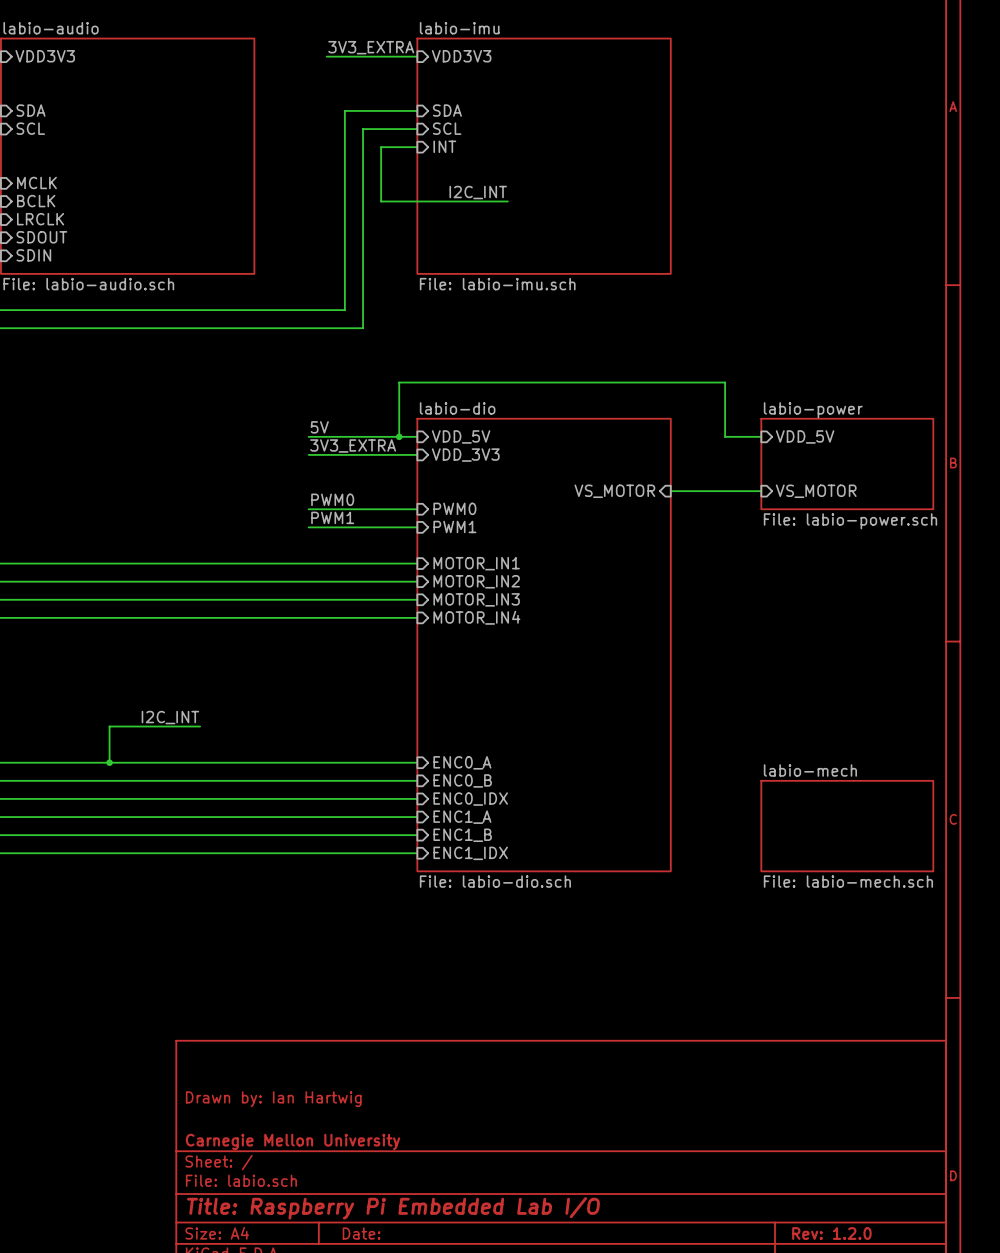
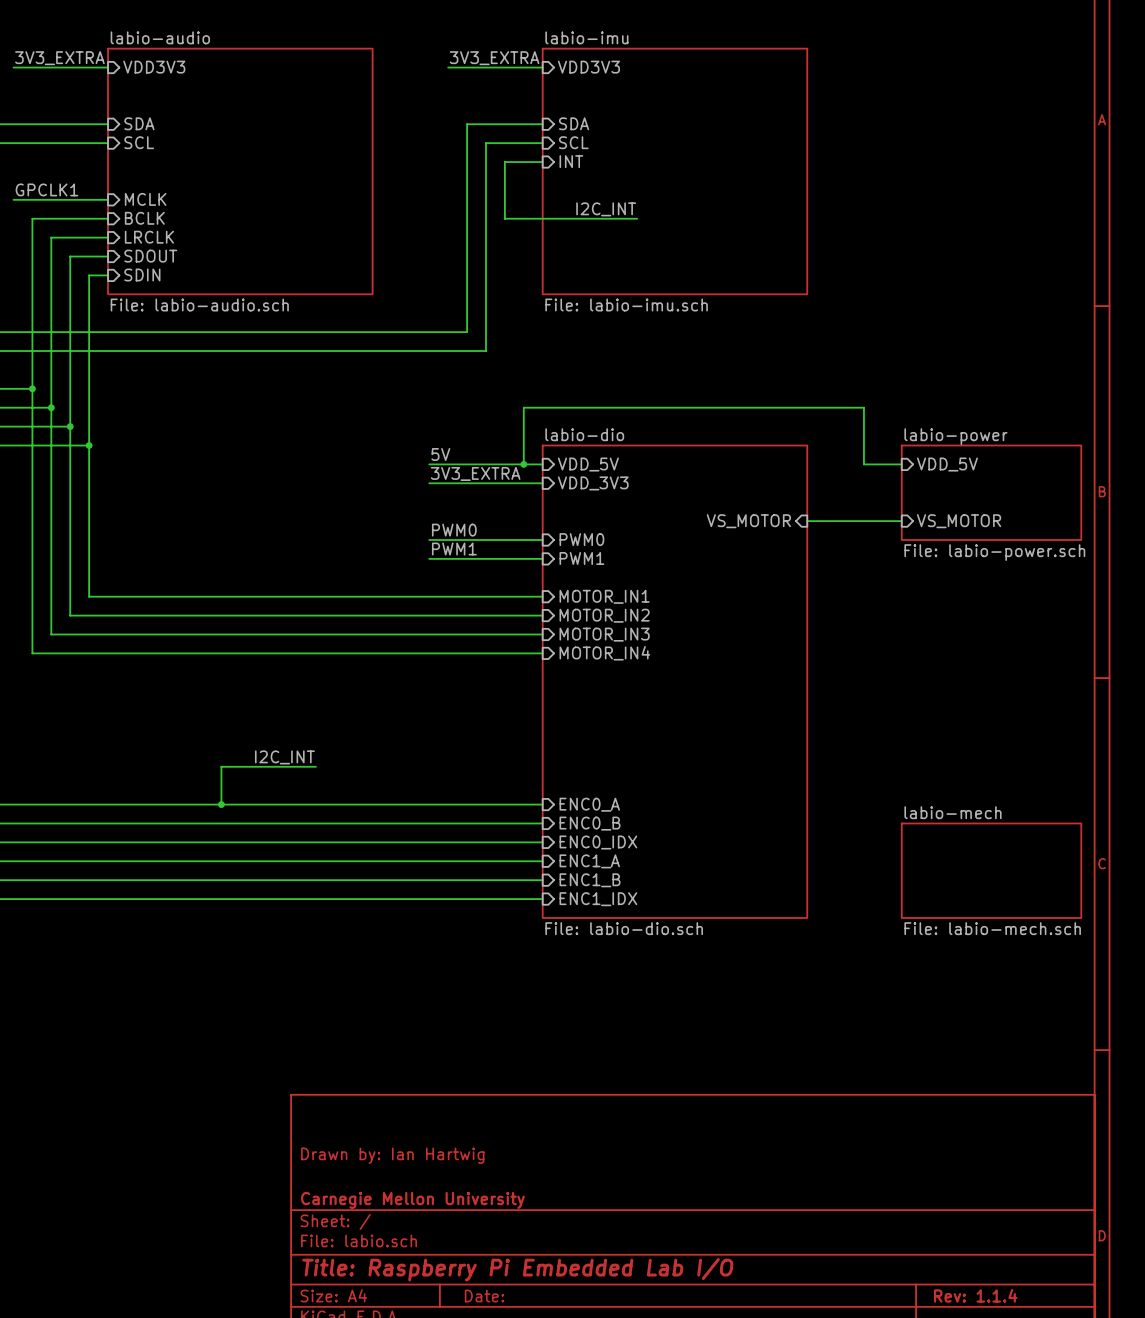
title block: Rev: 1.2.0 (831, 1233) -> Rev: 1.1.4 (975, 1295)

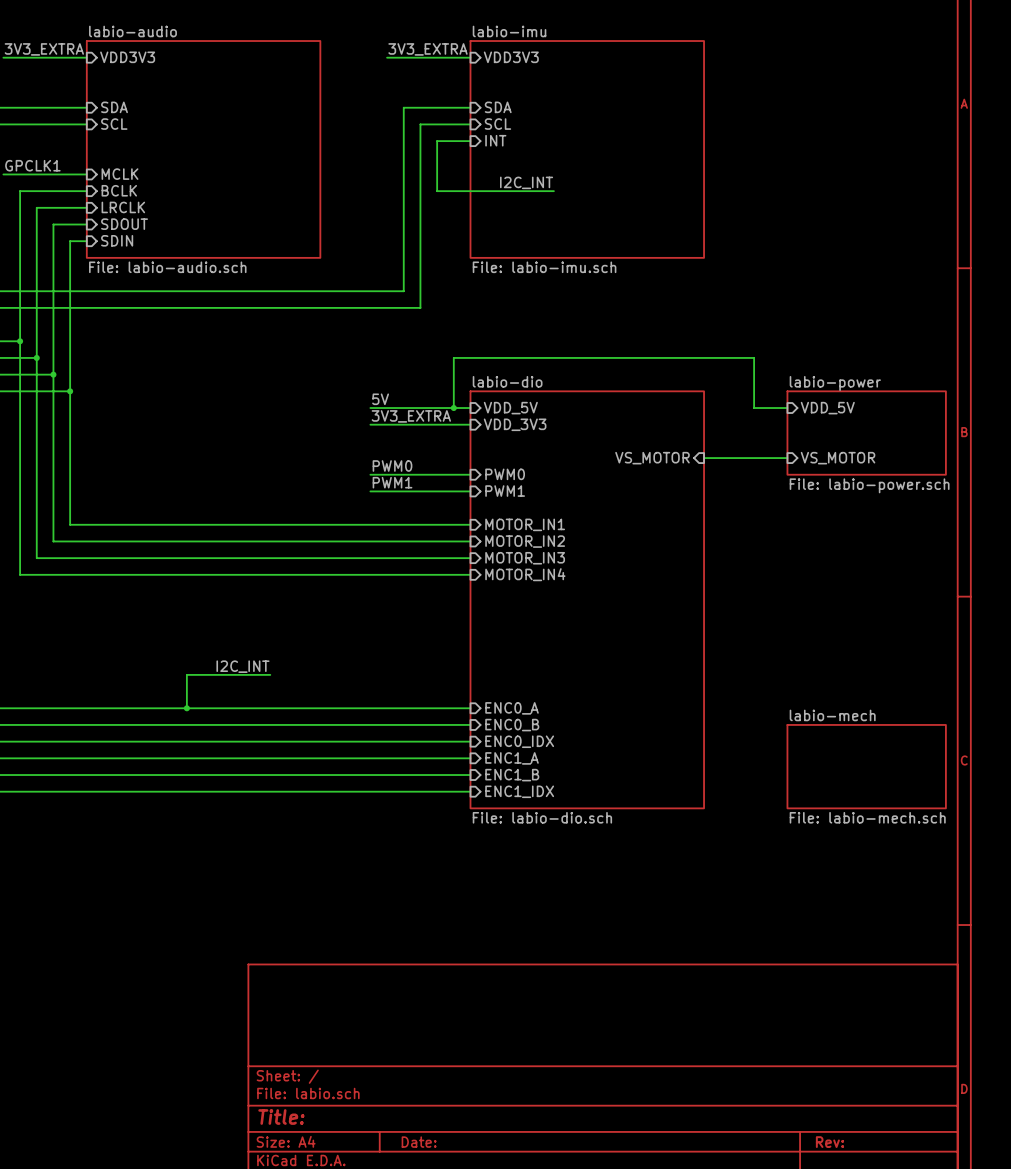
title block: Drawn by: Ian Hartwig (392, 1155) -> none
title block: Carnegie Mellon University (412, 1200) -> none
title block: Title: Raspberry Pi Embedded Lab I/O (517, 1269) -> Title: (281, 1117)
title block: Rev: 1.1.4 (975, 1295) -> Rev: (829, 1142)

